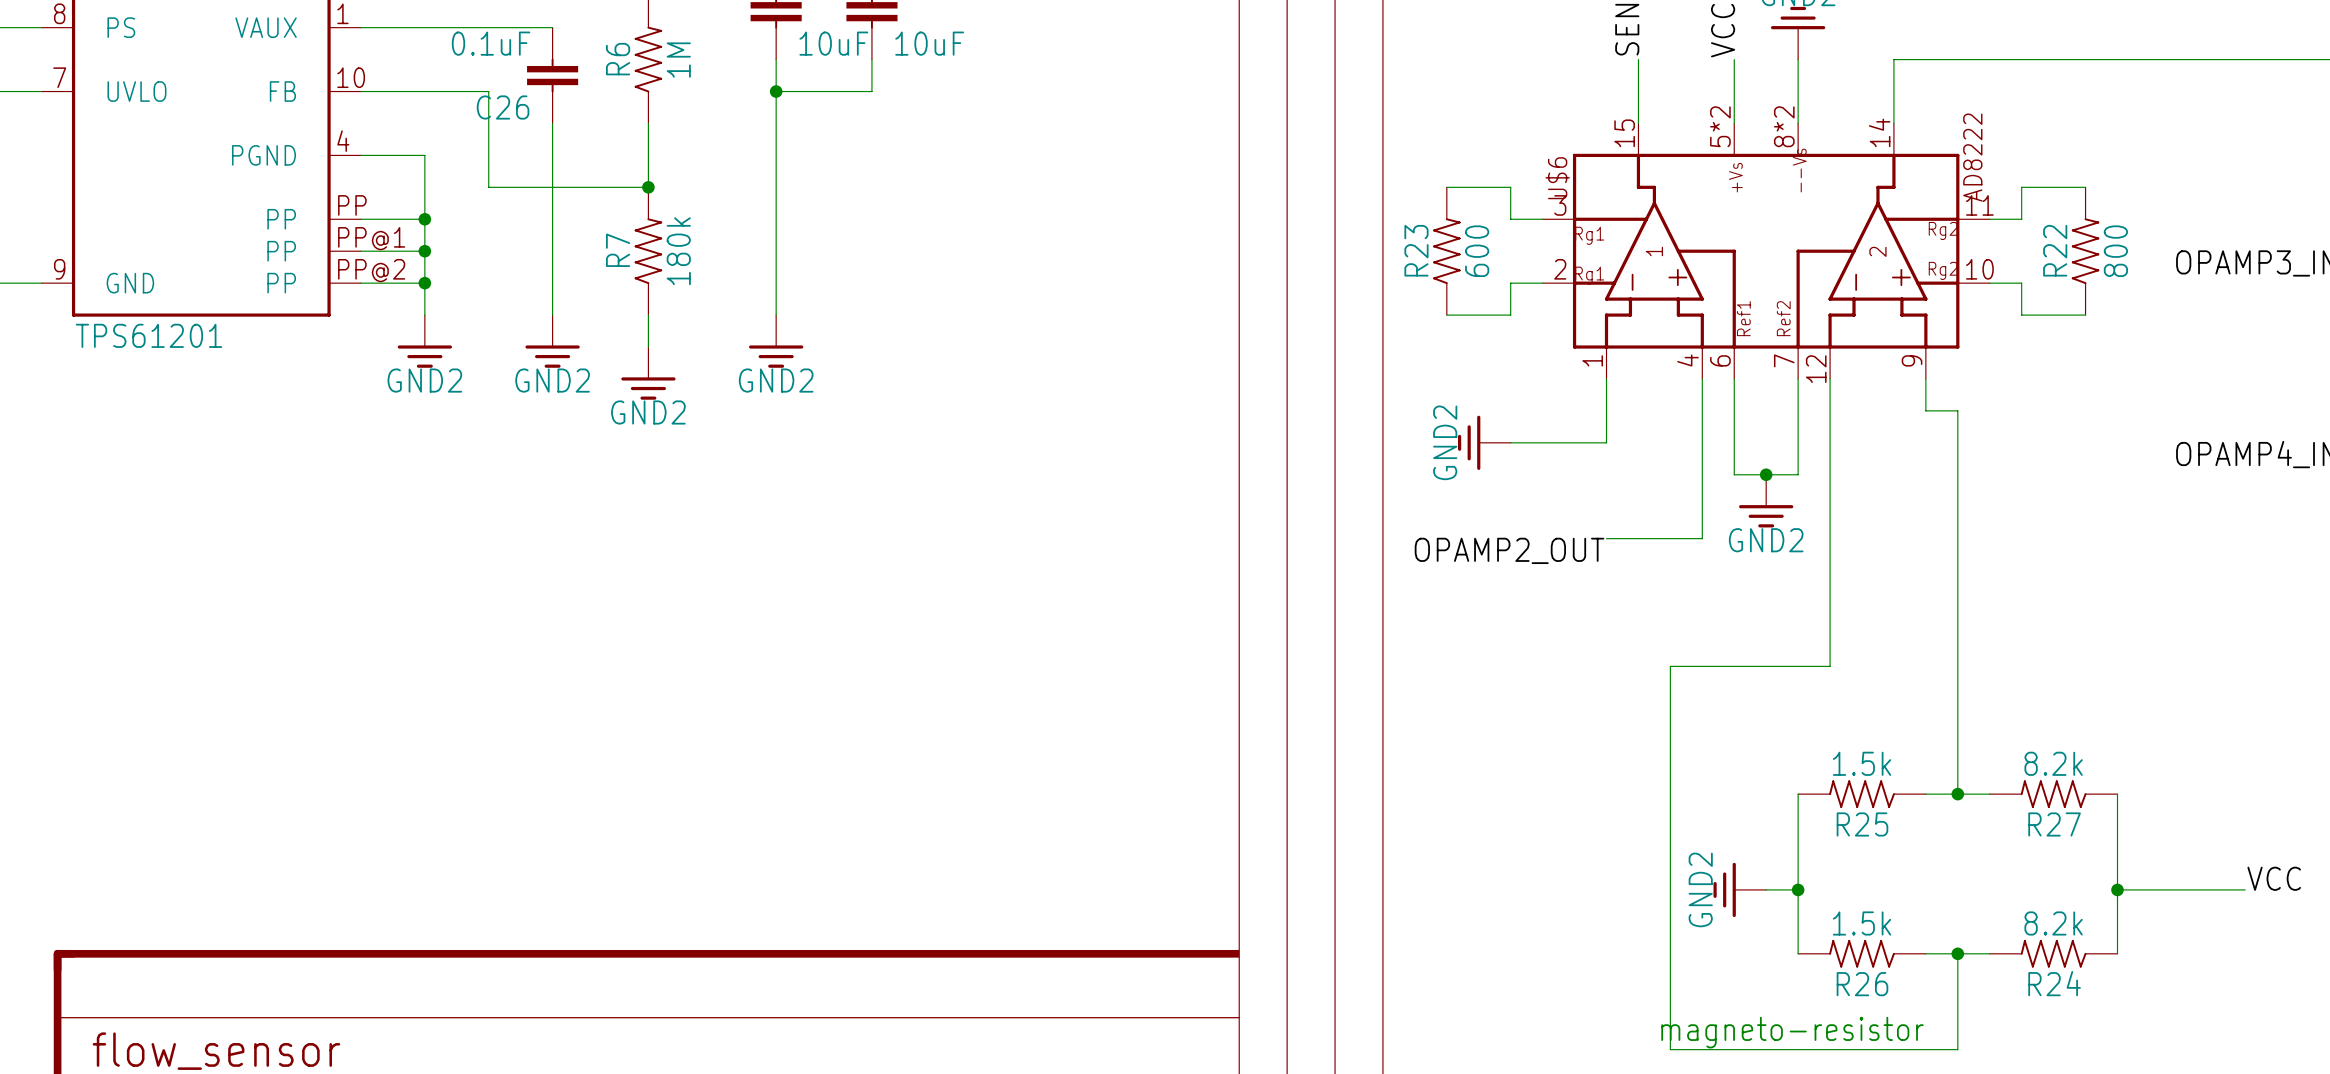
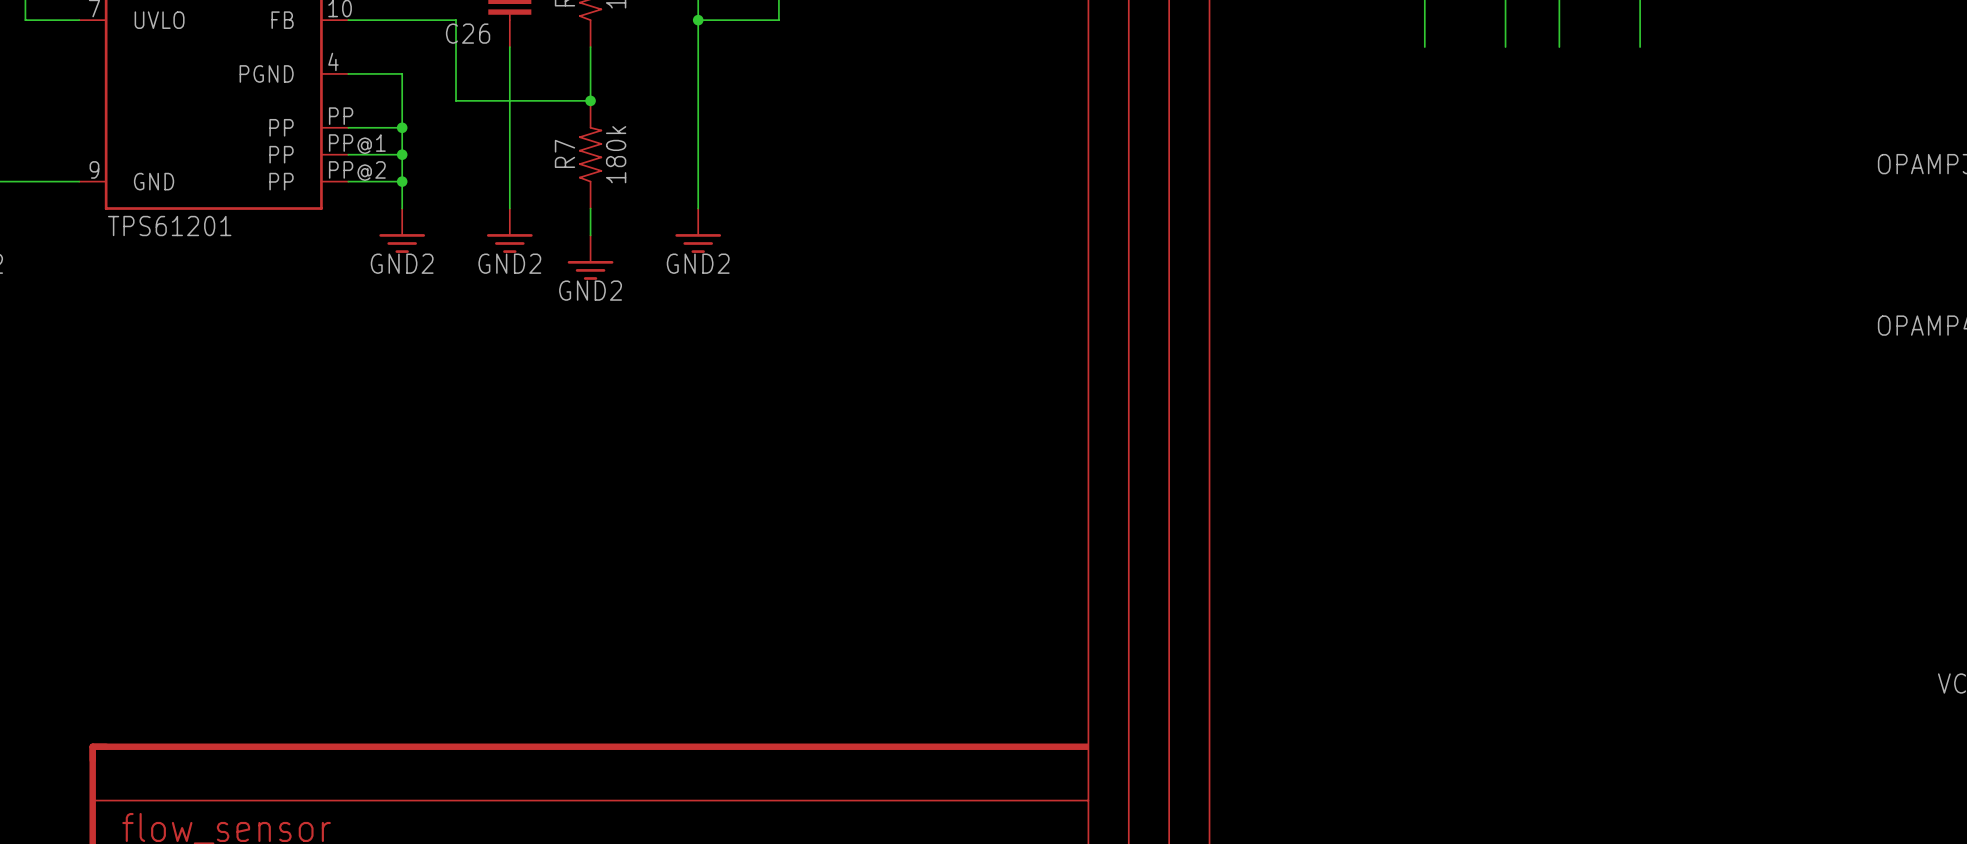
wire: (1446, 187) (1510, 187) (1510, 219) (1542, 219) -> none
wire: (2085, 187) (2021, 187) (2021, 219) (1989, 219) -> none
R23: 600 (1446, 251) -> none
U$6: AD8222 (1766, 251) -> none
R22: 800 (2085, 251) -> none
wire: (1542, 283) (1510, 283) (1510, 315) (1446, 315) -> none
wire: (1989, 283) (2021, 283) (2021, 315) (2085, 315) -> none
wire: (1606, 378) (1606, 442) (1510, 442) -> none
wire: (1702, 378) (1702, 538) (1606, 538) -> none
wire: (1734, 378) (1734, 474) (1798, 474) (1798, 378) -> none
wire: (1830, 378) (1830, 666) (1670, 666) (1670, 1049) (1957, 1049) (1957, 953) -> none
wire: (1925, 378) (1925, 410) (1957, 410) (1957, 794) -> none
power symbol: GND2 (1484, 442) -> none
junction: (1766, 474) -> none
power symbol: GND2 (1766, 501) -> none
label: OPAMP2_OUT (1509, 550) -> none
wire: (1798, 794) (1798, 953) -> none
R25: 1.5k (1861, 794) -> none
wire: (1925, 794) (1989, 794) -> none
junction: (1957, 794) -> none
R27: 8.2k (2053, 794) -> none
wire: (2117, 794) (2117, 953) -> none
power symbol: GND2 (1739, 889) -> none
wire: (1766, 889) (1798, 889) -> none
junction: (1798, 889) -> none
wire: (2117, 889) (2245, 889) -> none
junction: (2117, 889) -> none
R26: 1.5k (1861, 953) -> none
wire: (1925, 953) (1989, 953) -> none
junction: (1957, 953) -> none
R24: 8.2k (2053, 953) -> none
text: magneto-resistor (1792, 1032) -> none

